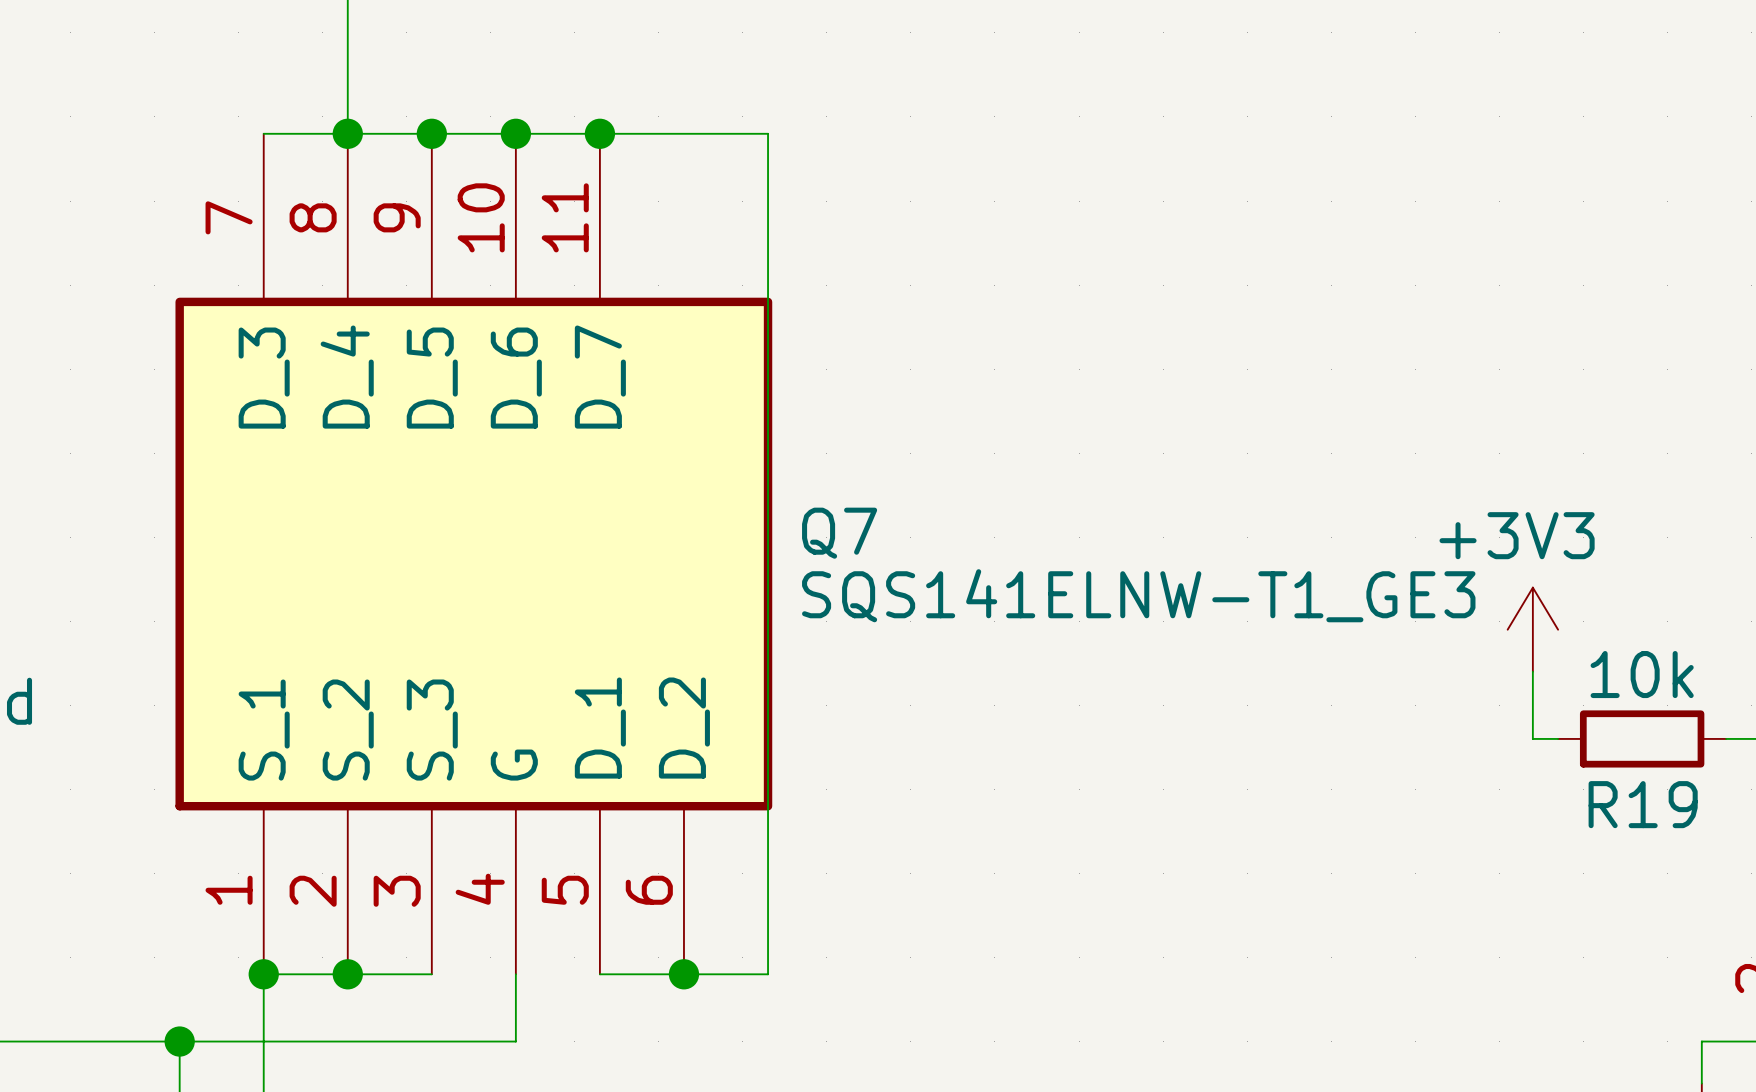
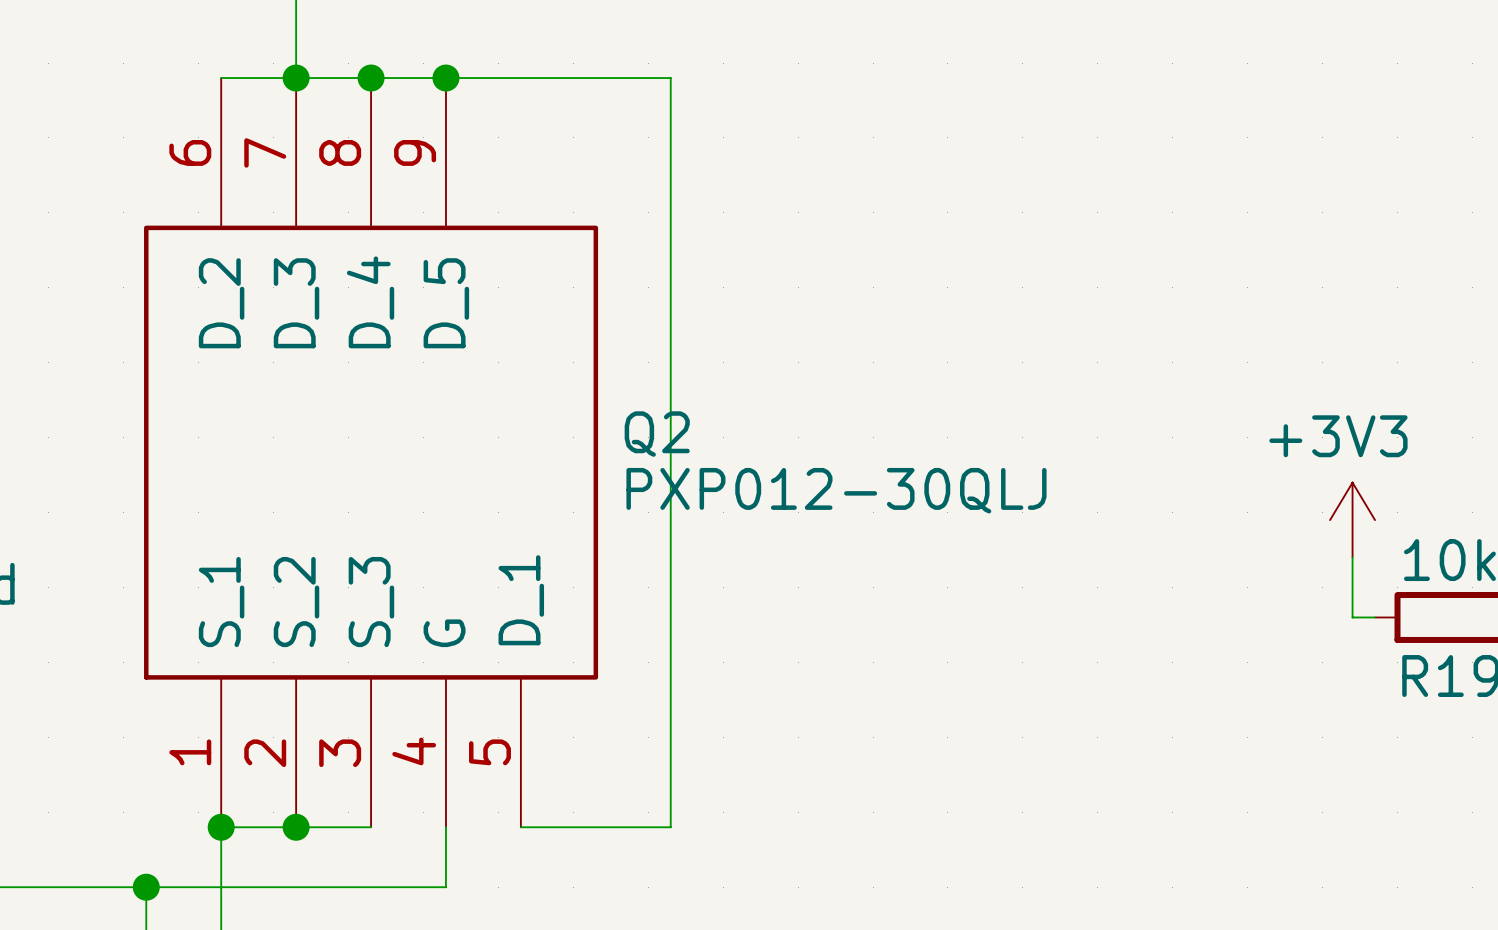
junction: (599, 133) -> none
Q2: none -> PXP012-30QLJ (371, 452)
Q7: SQS141ELNW-T1_GE3 (473, 554) -> none
junction: (683, 974) -> none

